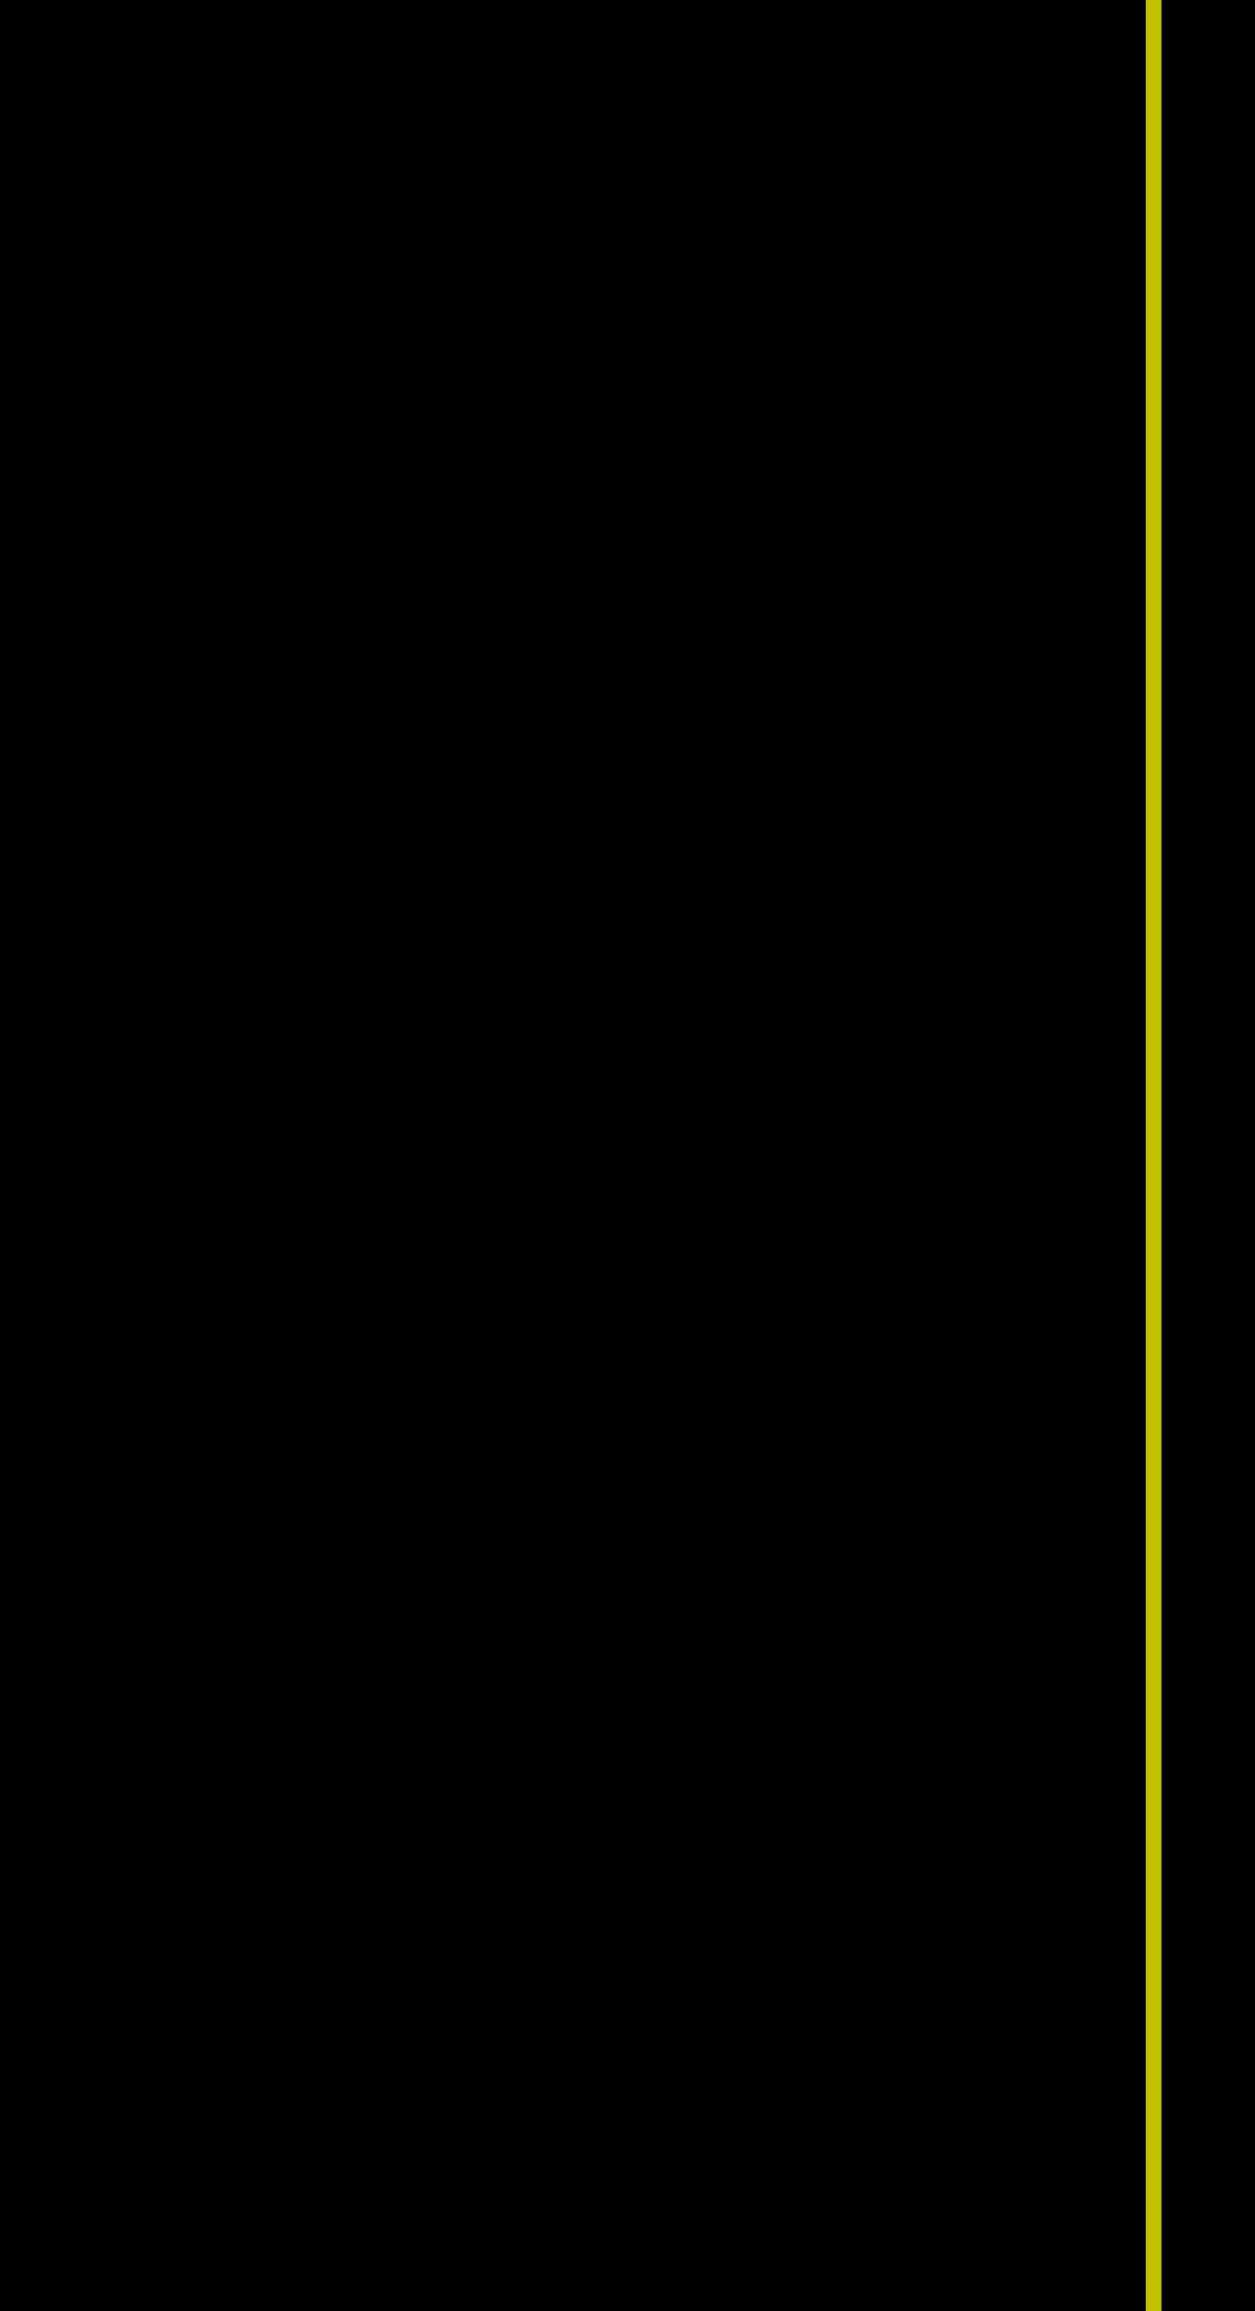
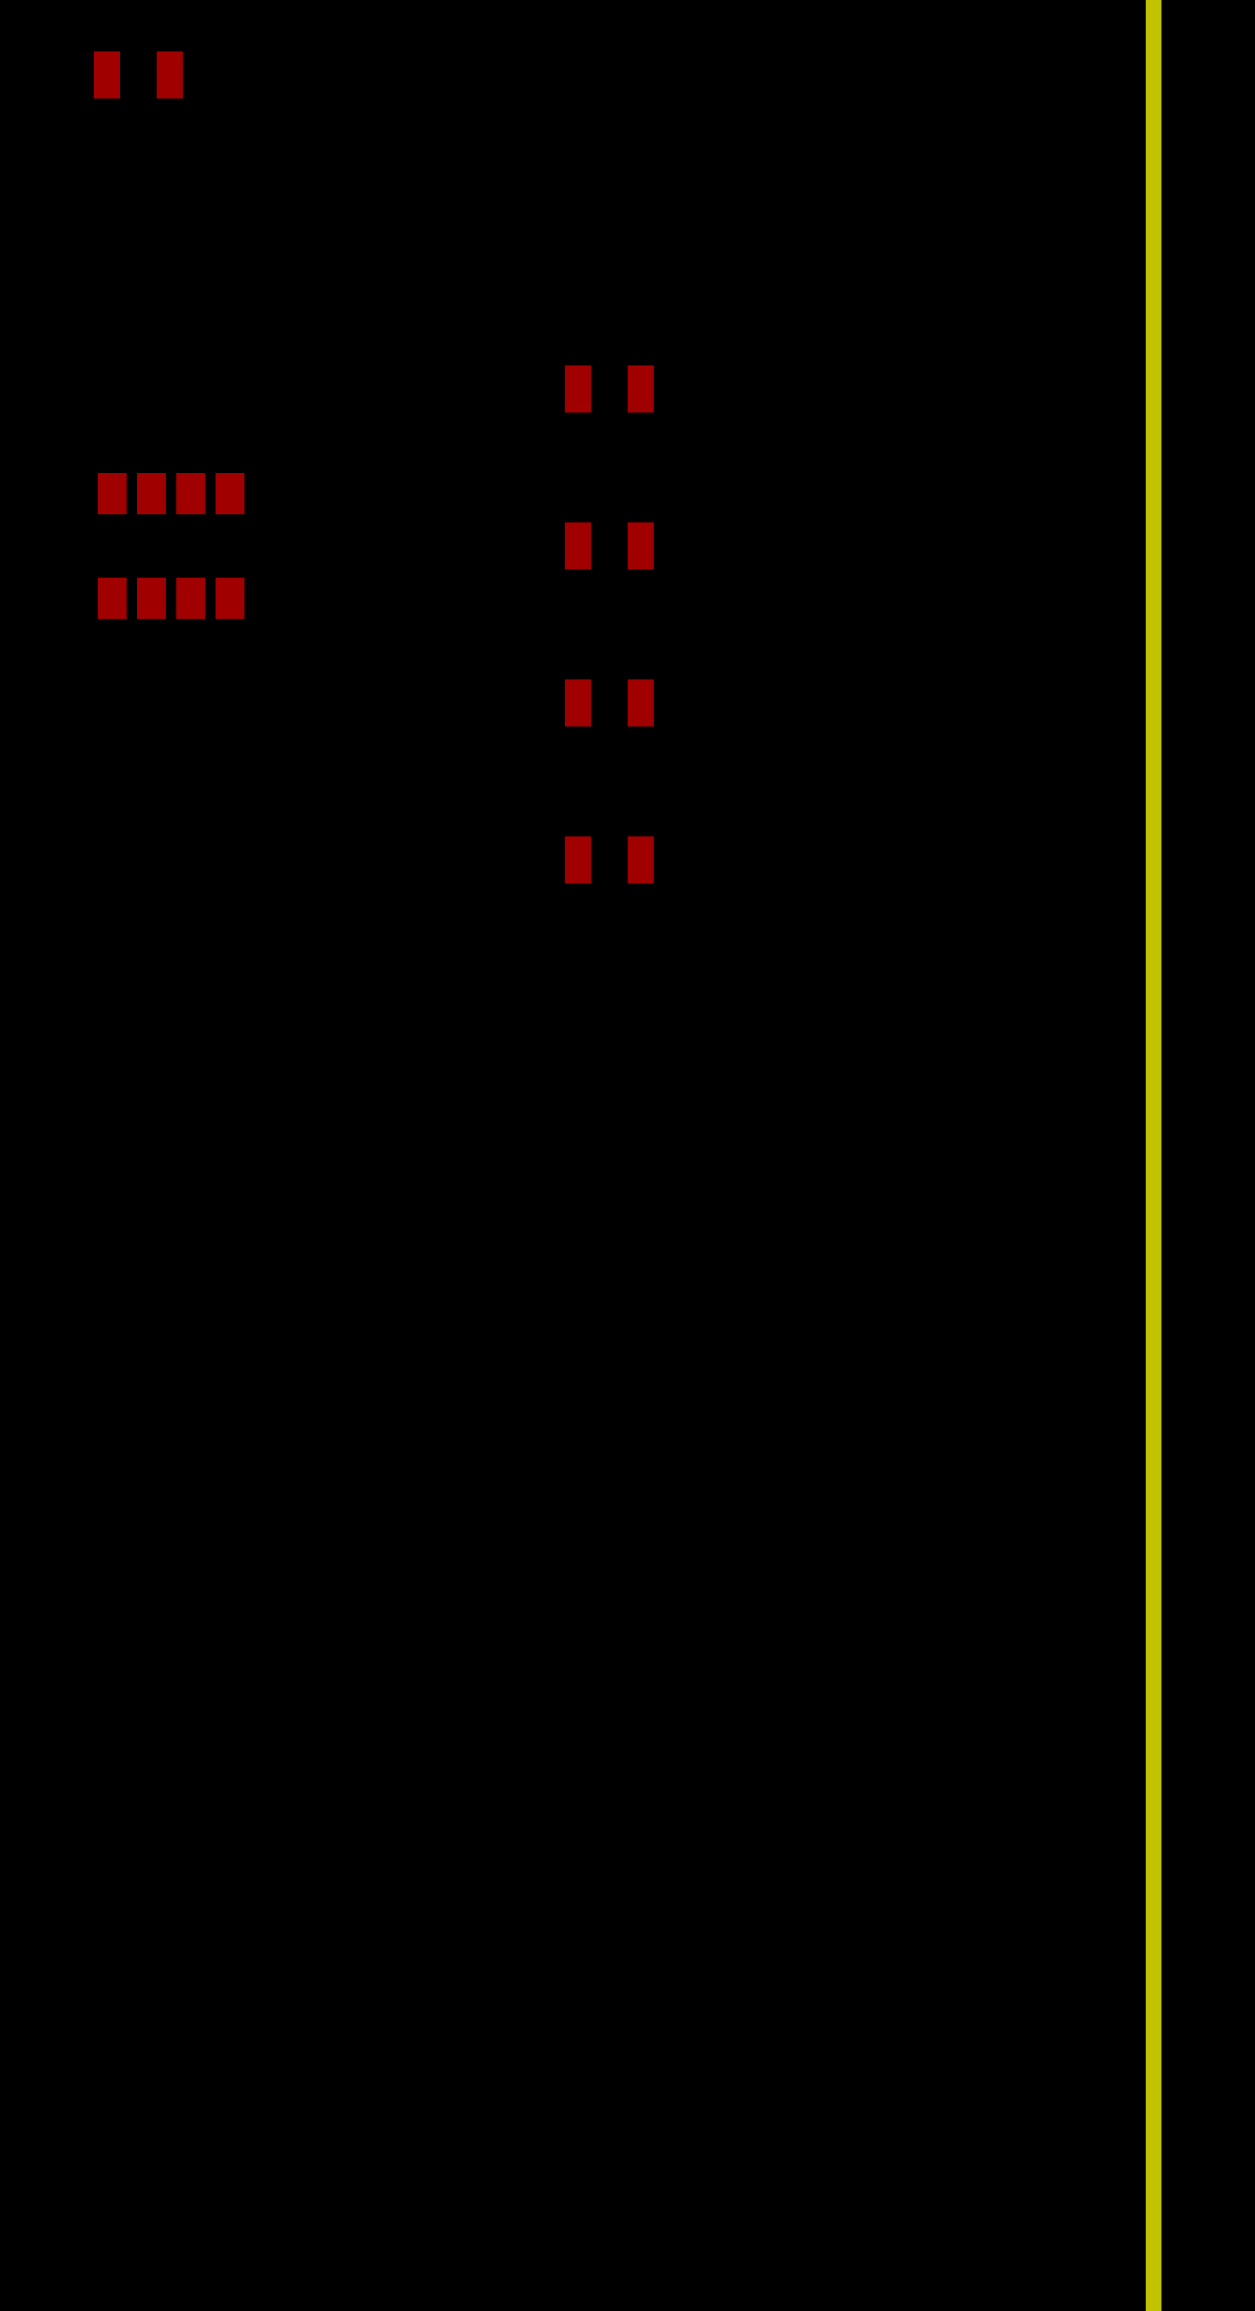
part: none -> (138, 74)
part: none -> (609, 388)
part: none -> (171, 545)
part: none -> (609, 545)
part: none -> (609, 702)
part: none -> (609, 859)

